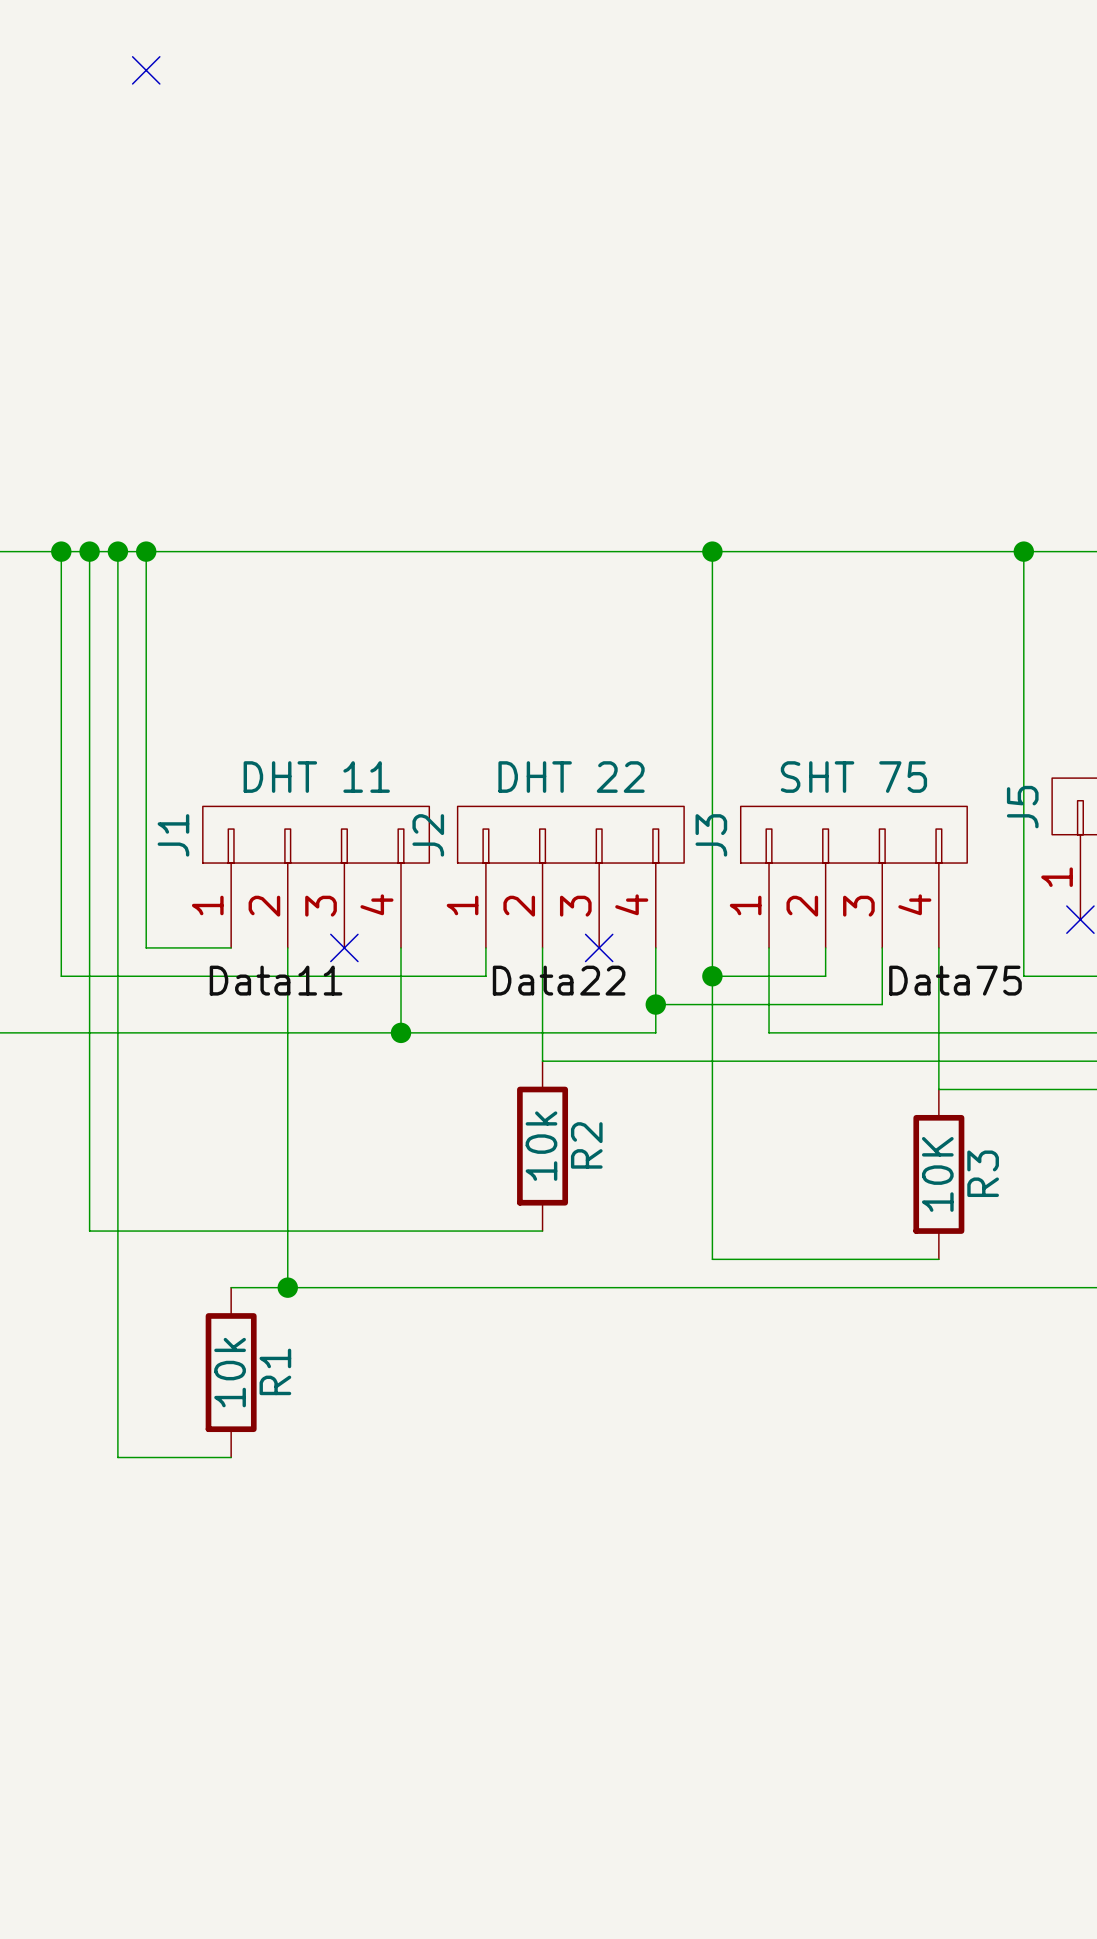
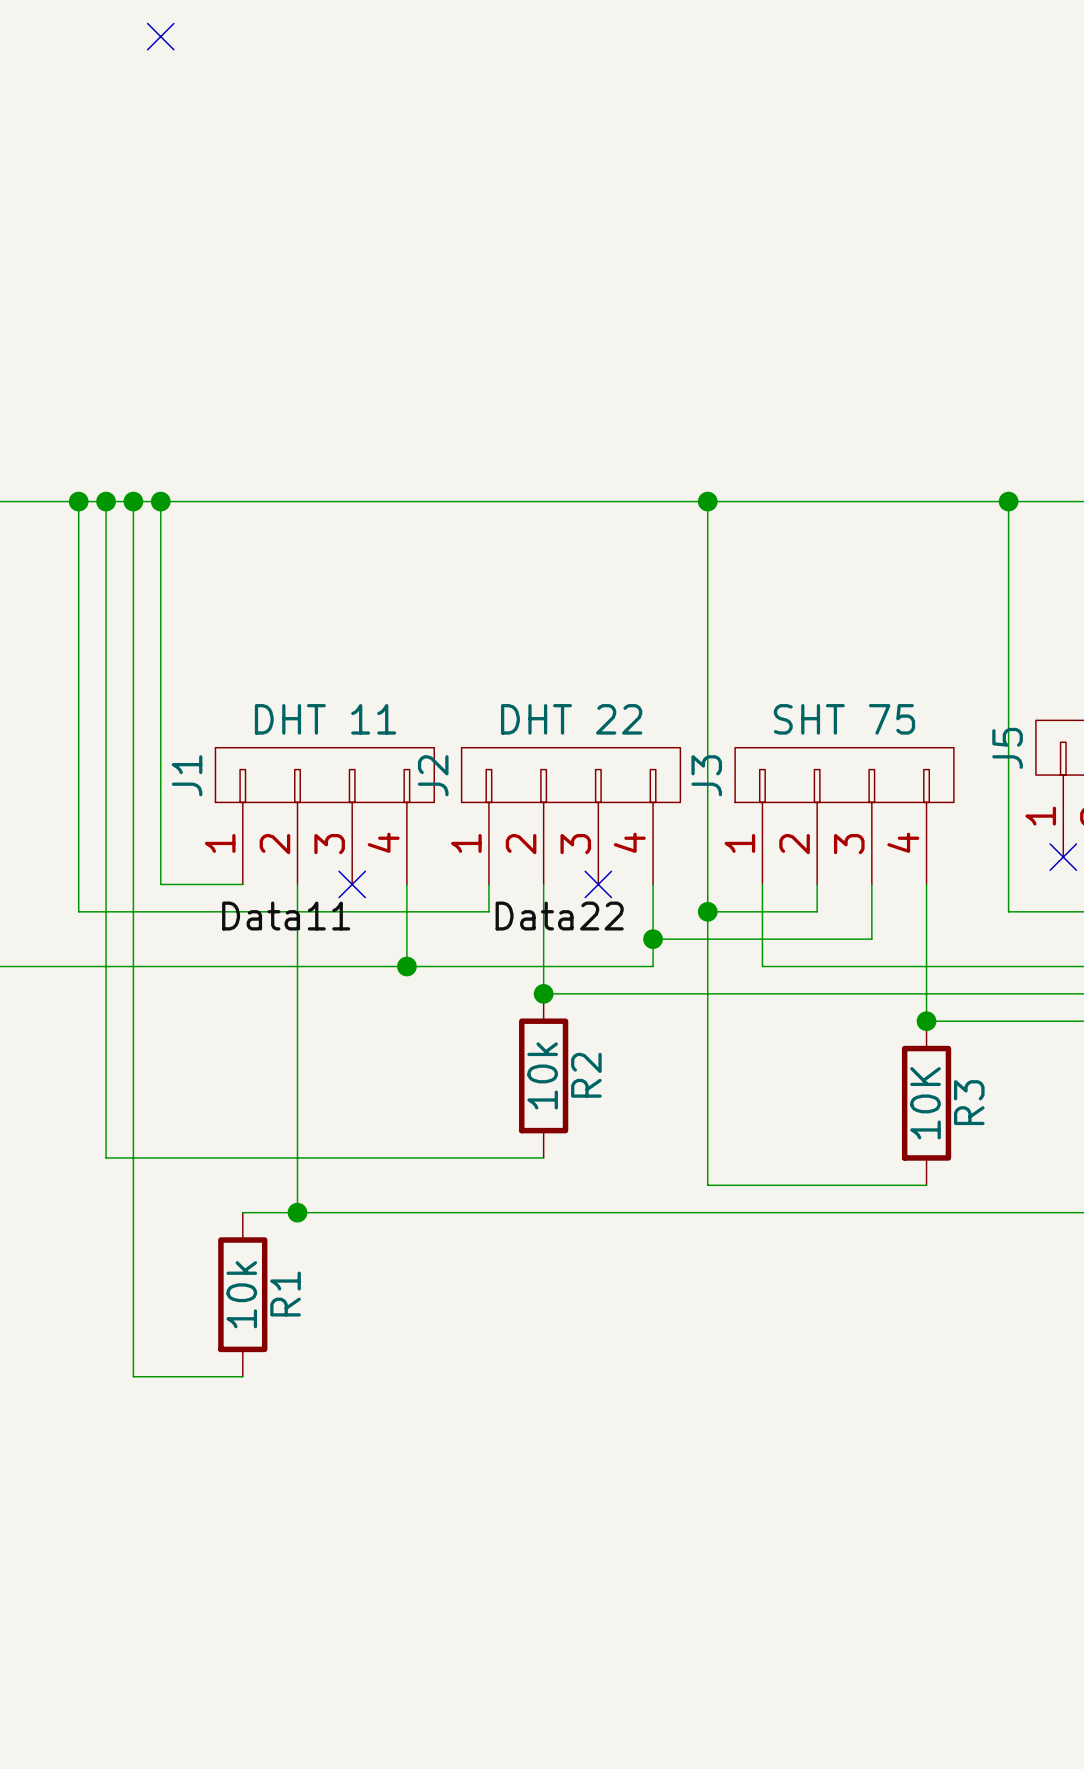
label: Data75 (955, 980) -> none
junction: none -> (543, 993)
junction: none -> (926, 1021)

